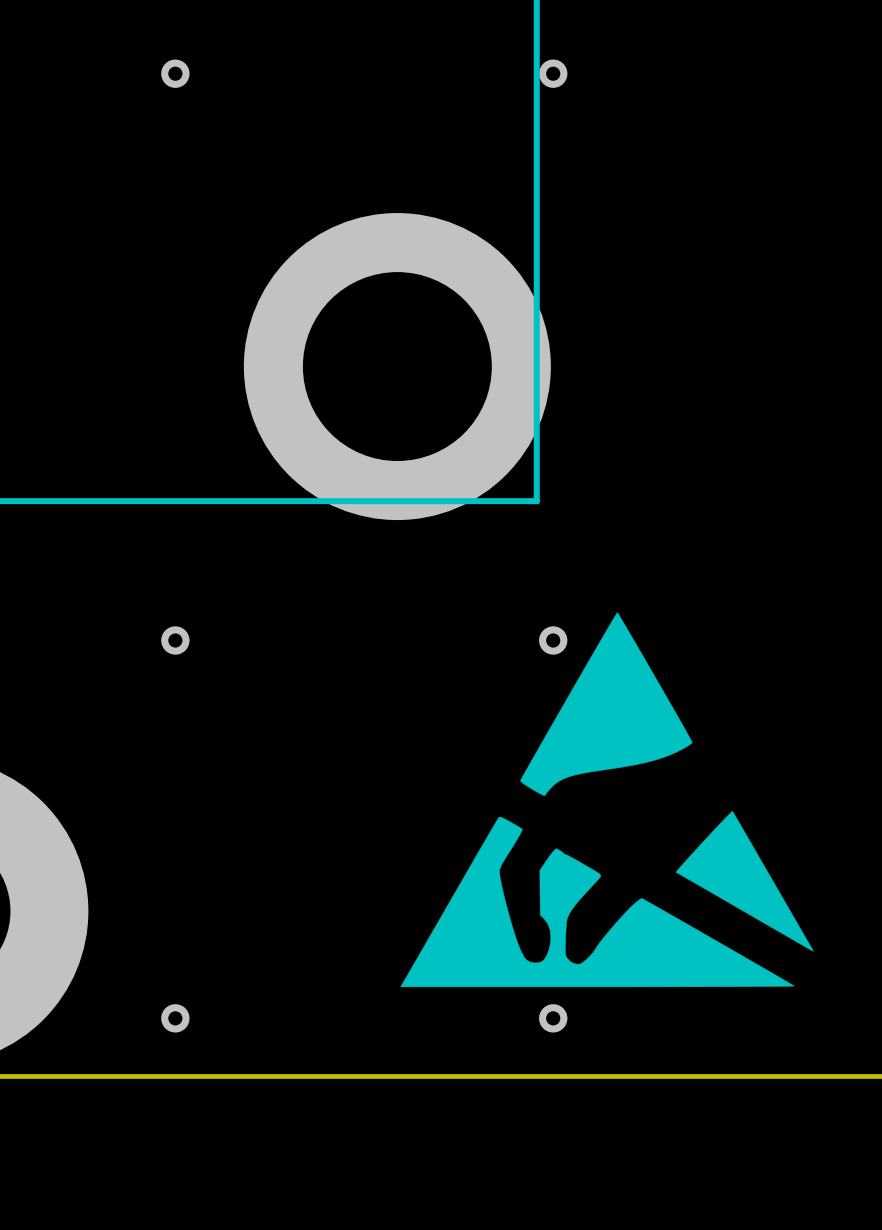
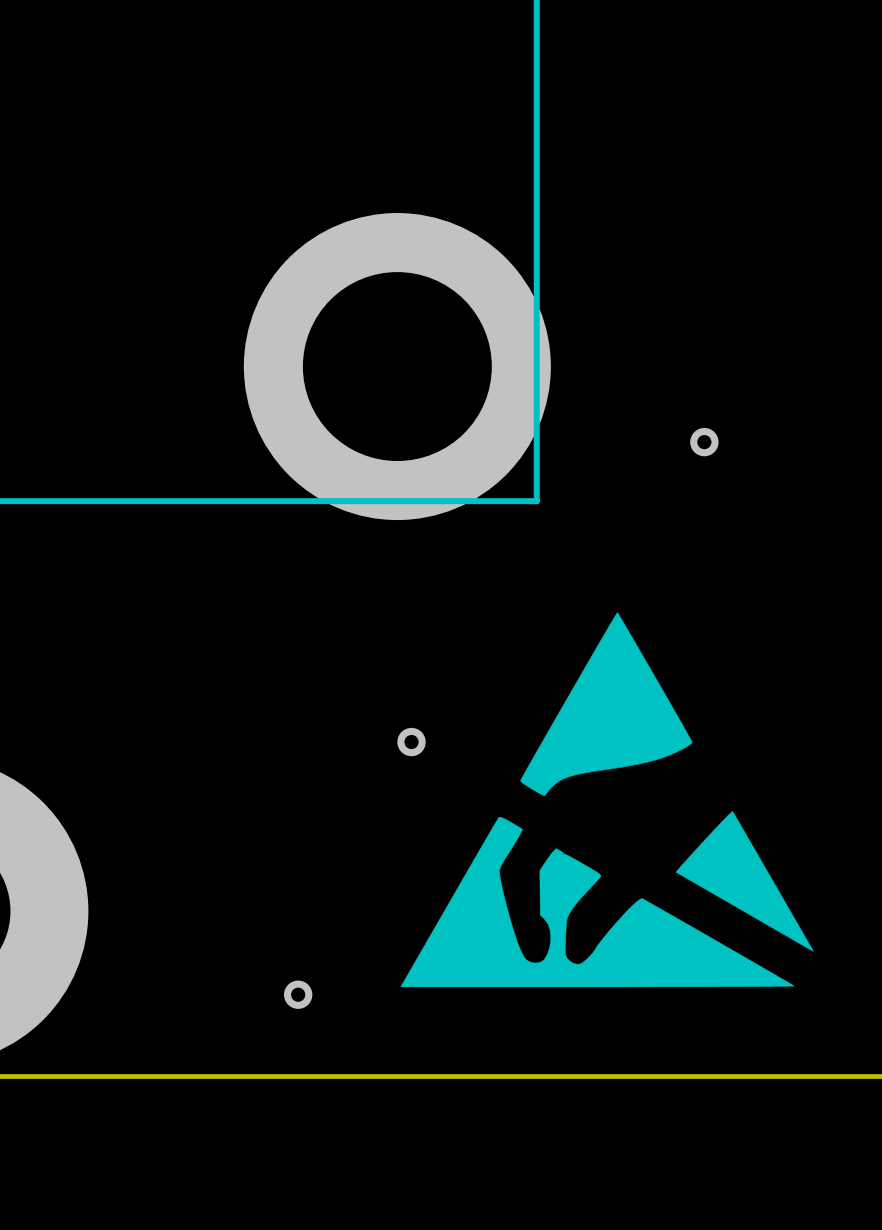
via: (175, 73) -> none
via: (553, 73) -> none
via: none -> (704, 442)
via: (175, 640) -> none
via: (553, 640) -> none
via: none -> (411, 742)
via position: (175, 1018) -> (298, 994)
via: (553, 1018) -> none

